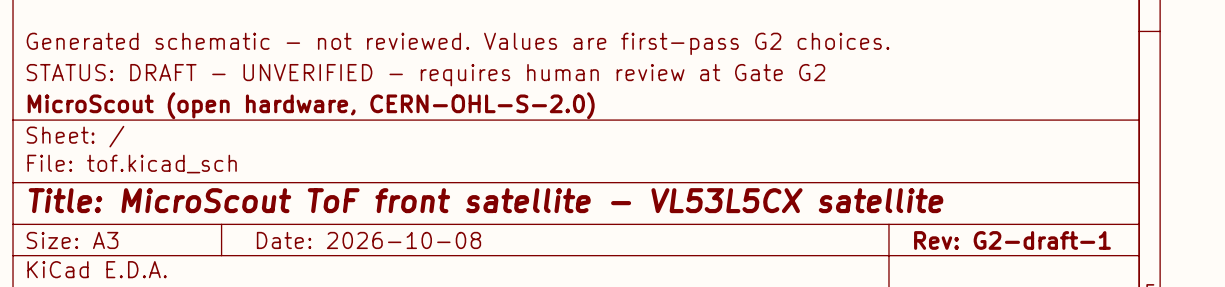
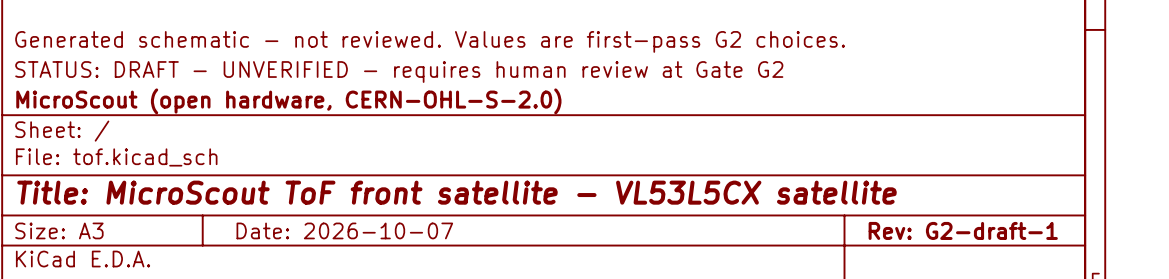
title block: Date: 2026-10-08 (368, 240) -> Date: 2026-10-07 (344, 230)

